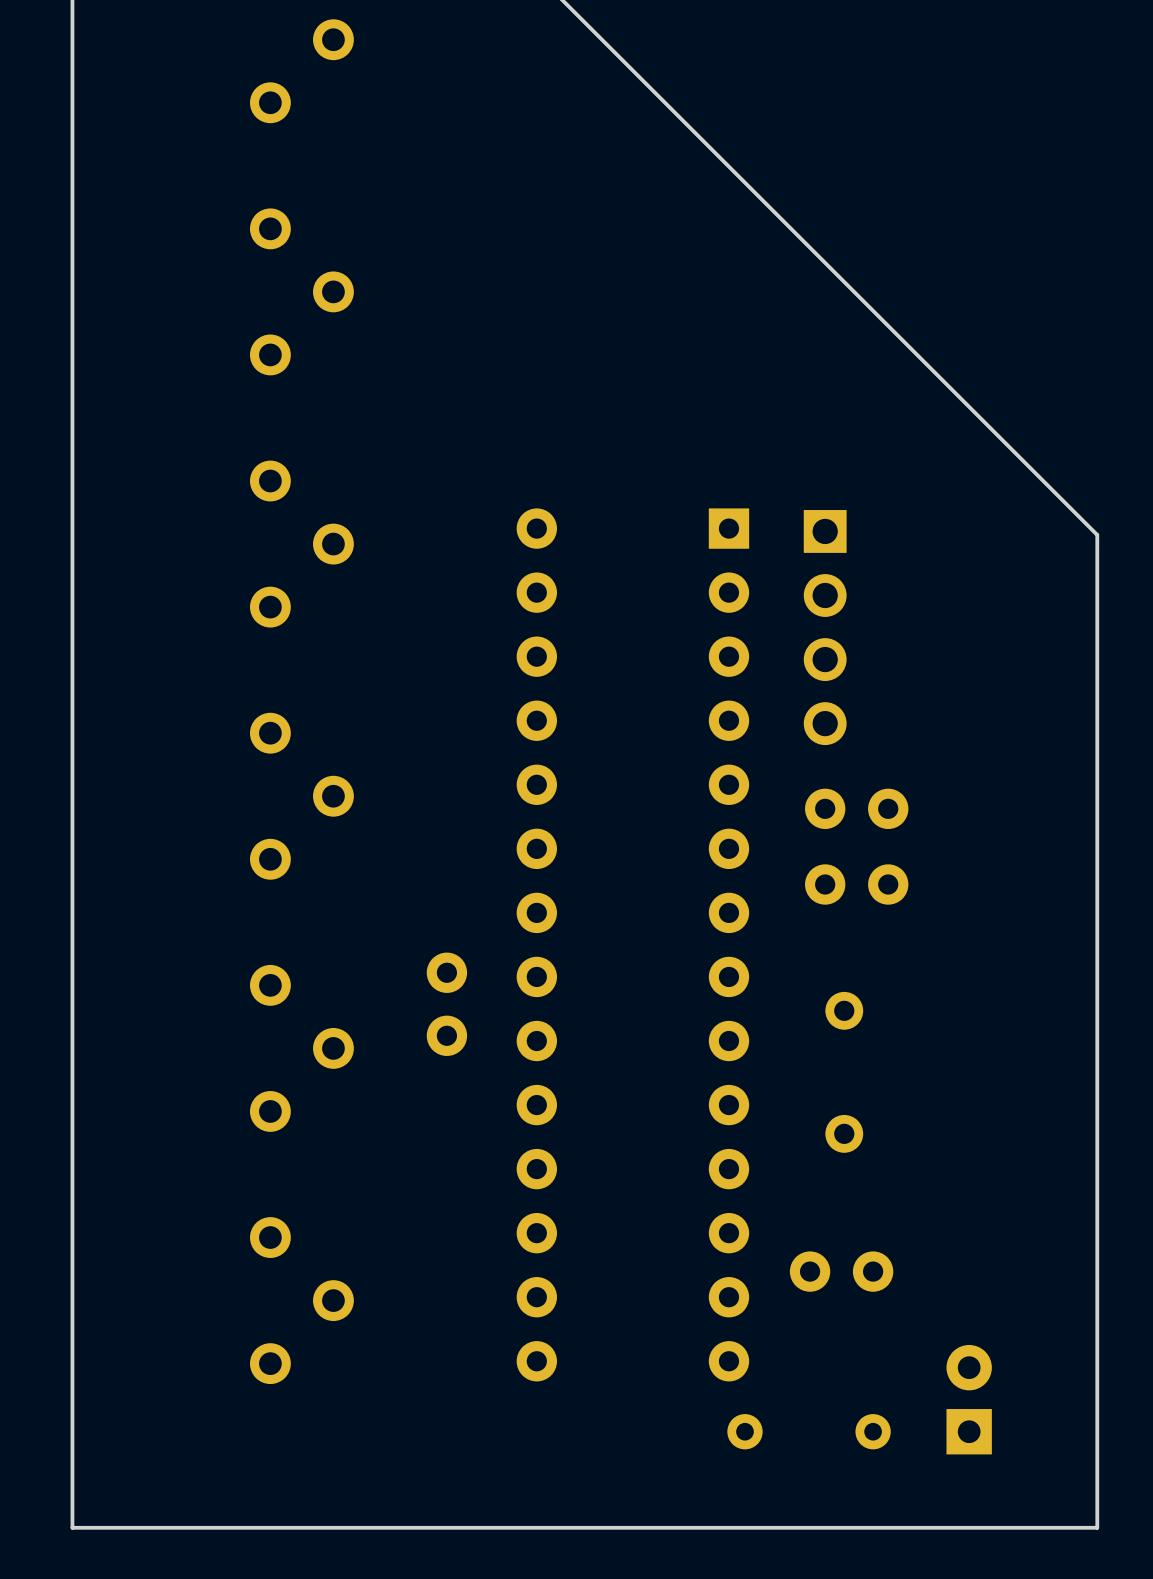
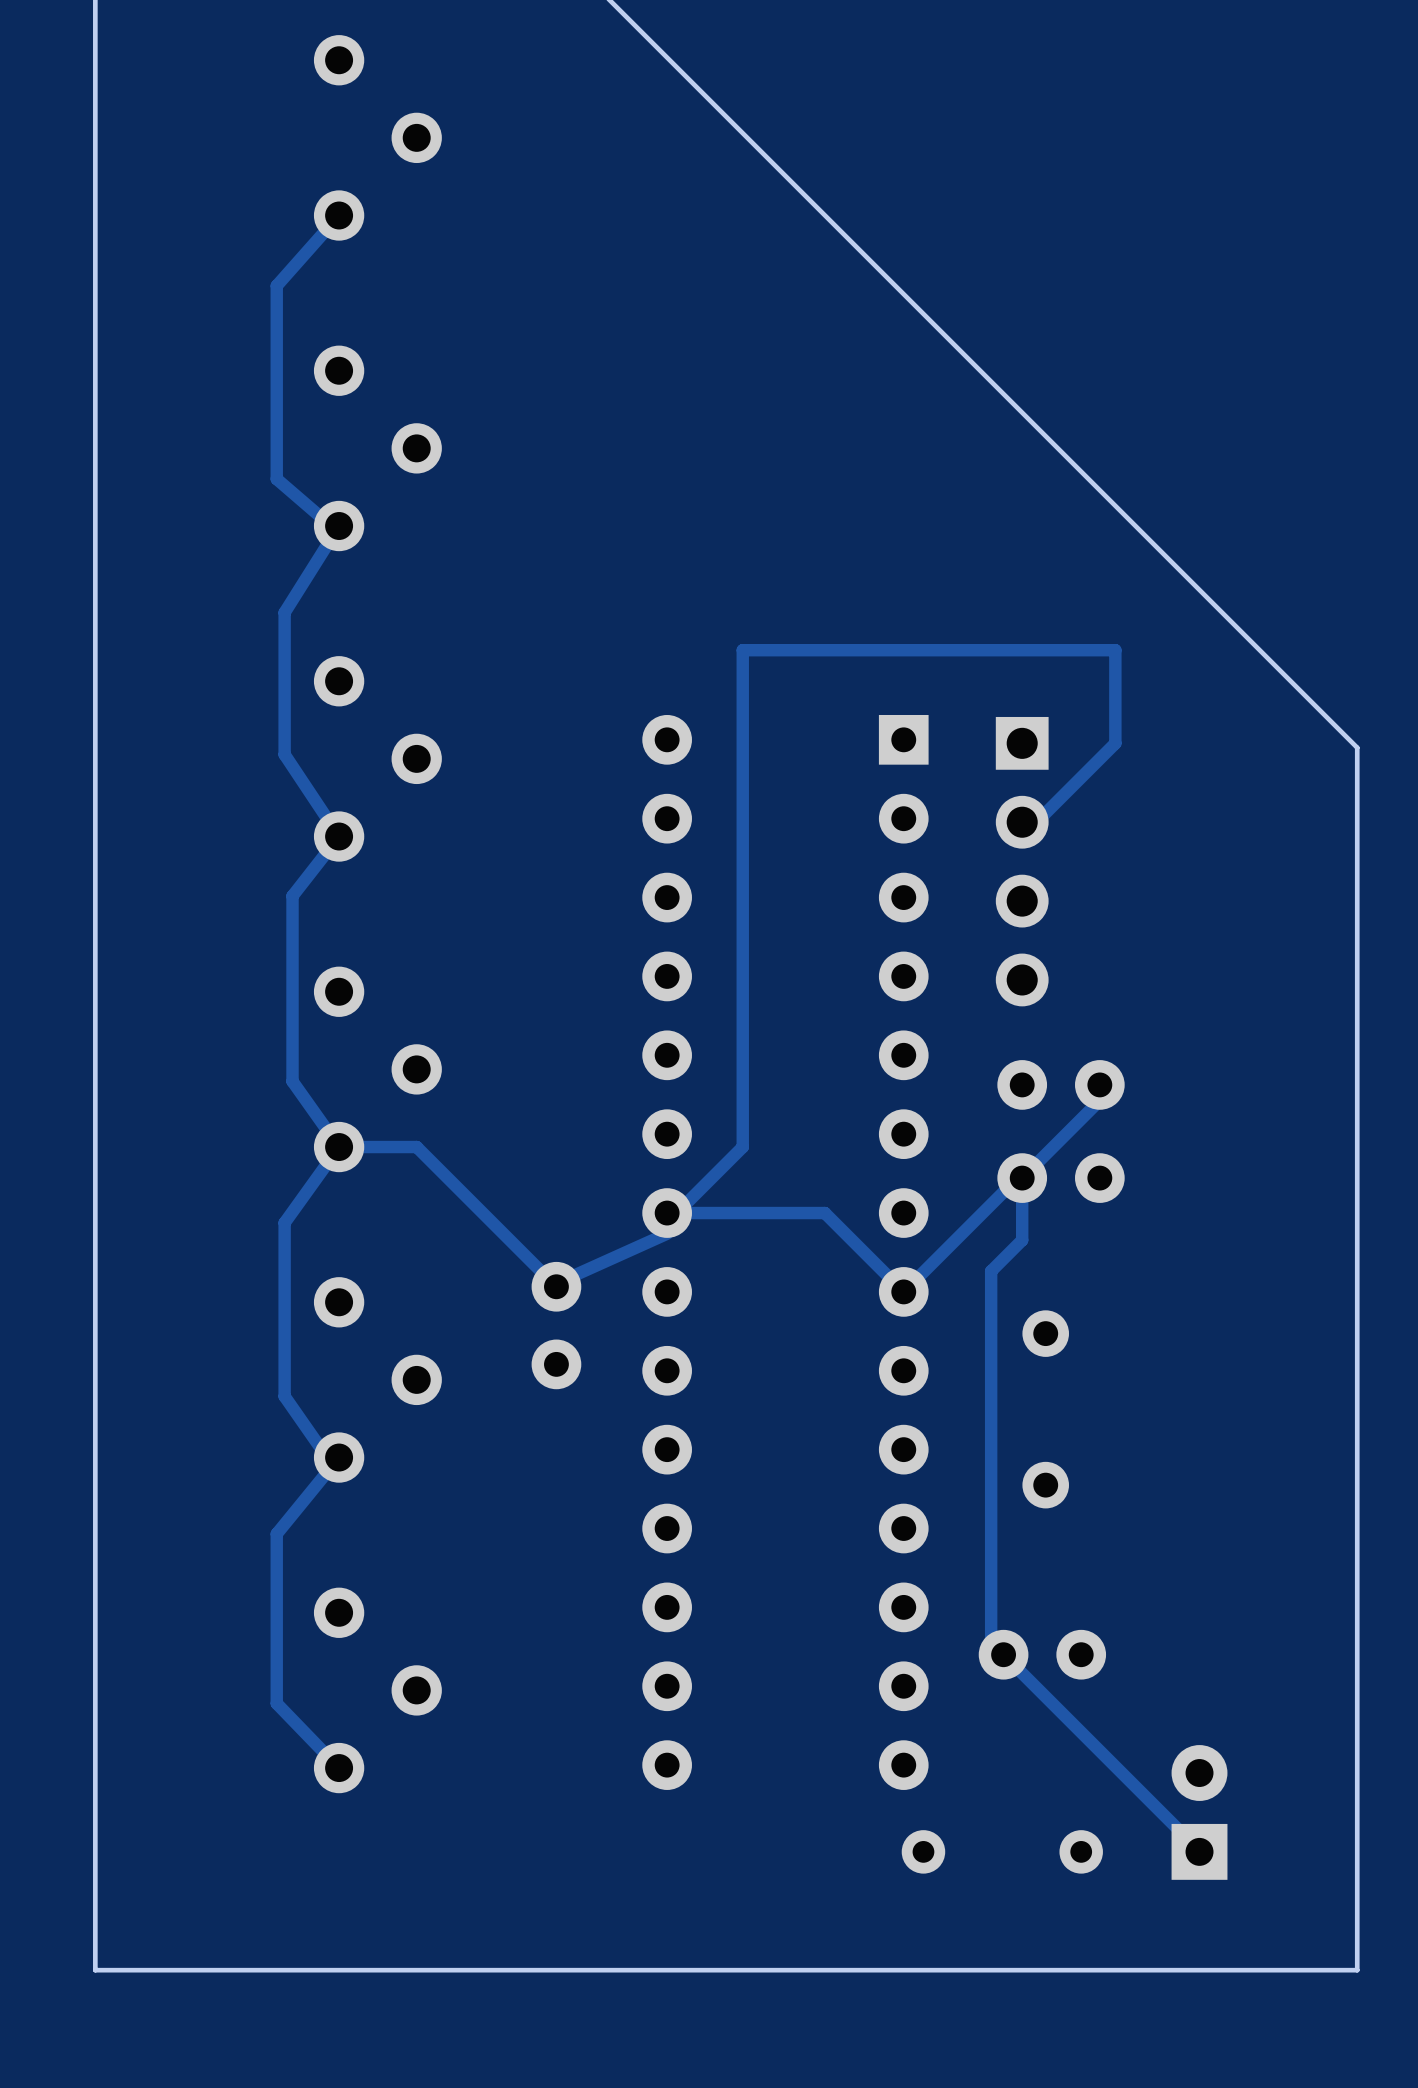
track: none -> (339, 215) (276, 285) (276, 479) (331, 526)
track: none -> (339, 526) (284, 612) (284, 754) (339, 836) (292, 896) (292, 1081) (339, 1147)
track: none -> (1036, 822) (1115, 743) (1115, 650) (742, 650) (742, 1147) (676, 1213)
track: none -> (1099, 1100) (1022, 1178) (1022, 1240) (991, 1271) (991, 1642)
track: none -> (339, 1147) (416, 1147) (556, 1286)
track: none -> (339, 1147) (284, 1222) (284, 1396) (327, 1457)
track: none -> (1017, 1178) (903, 1291) (824, 1213) (667, 1213)
track: none -> (667, 1233) (554, 1284)
track: none -> (339, 1457) (276, 1533) (276, 1703) (339, 1768)
track: none -> (1003, 1654) (1199, 1850)

